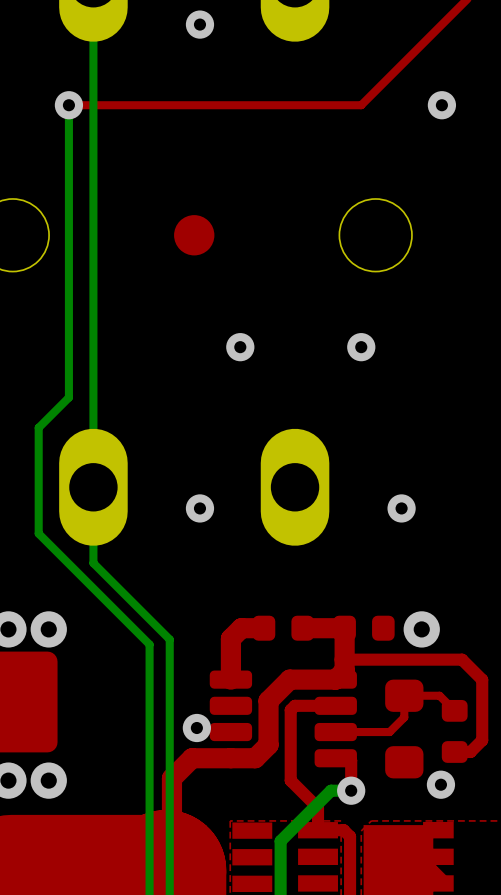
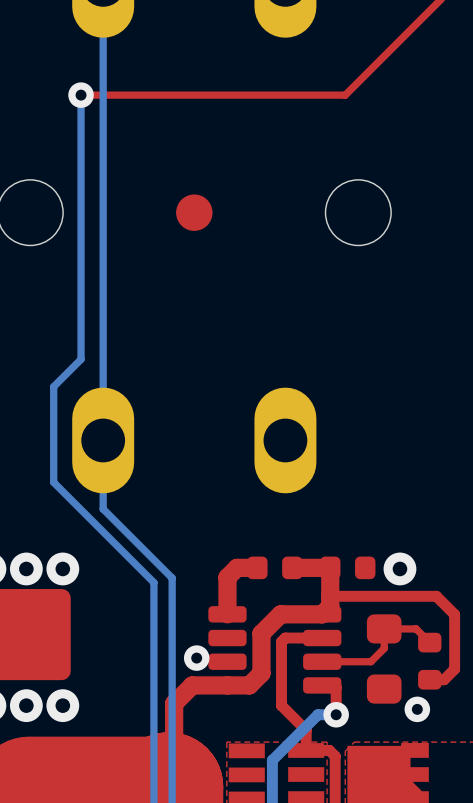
via: (199, 24) -> none
via: (441, 105) -> none
via: (240, 347) -> none
via: (361, 347) -> none
via: (199, 508) -> none
via: (401, 508) -> none

